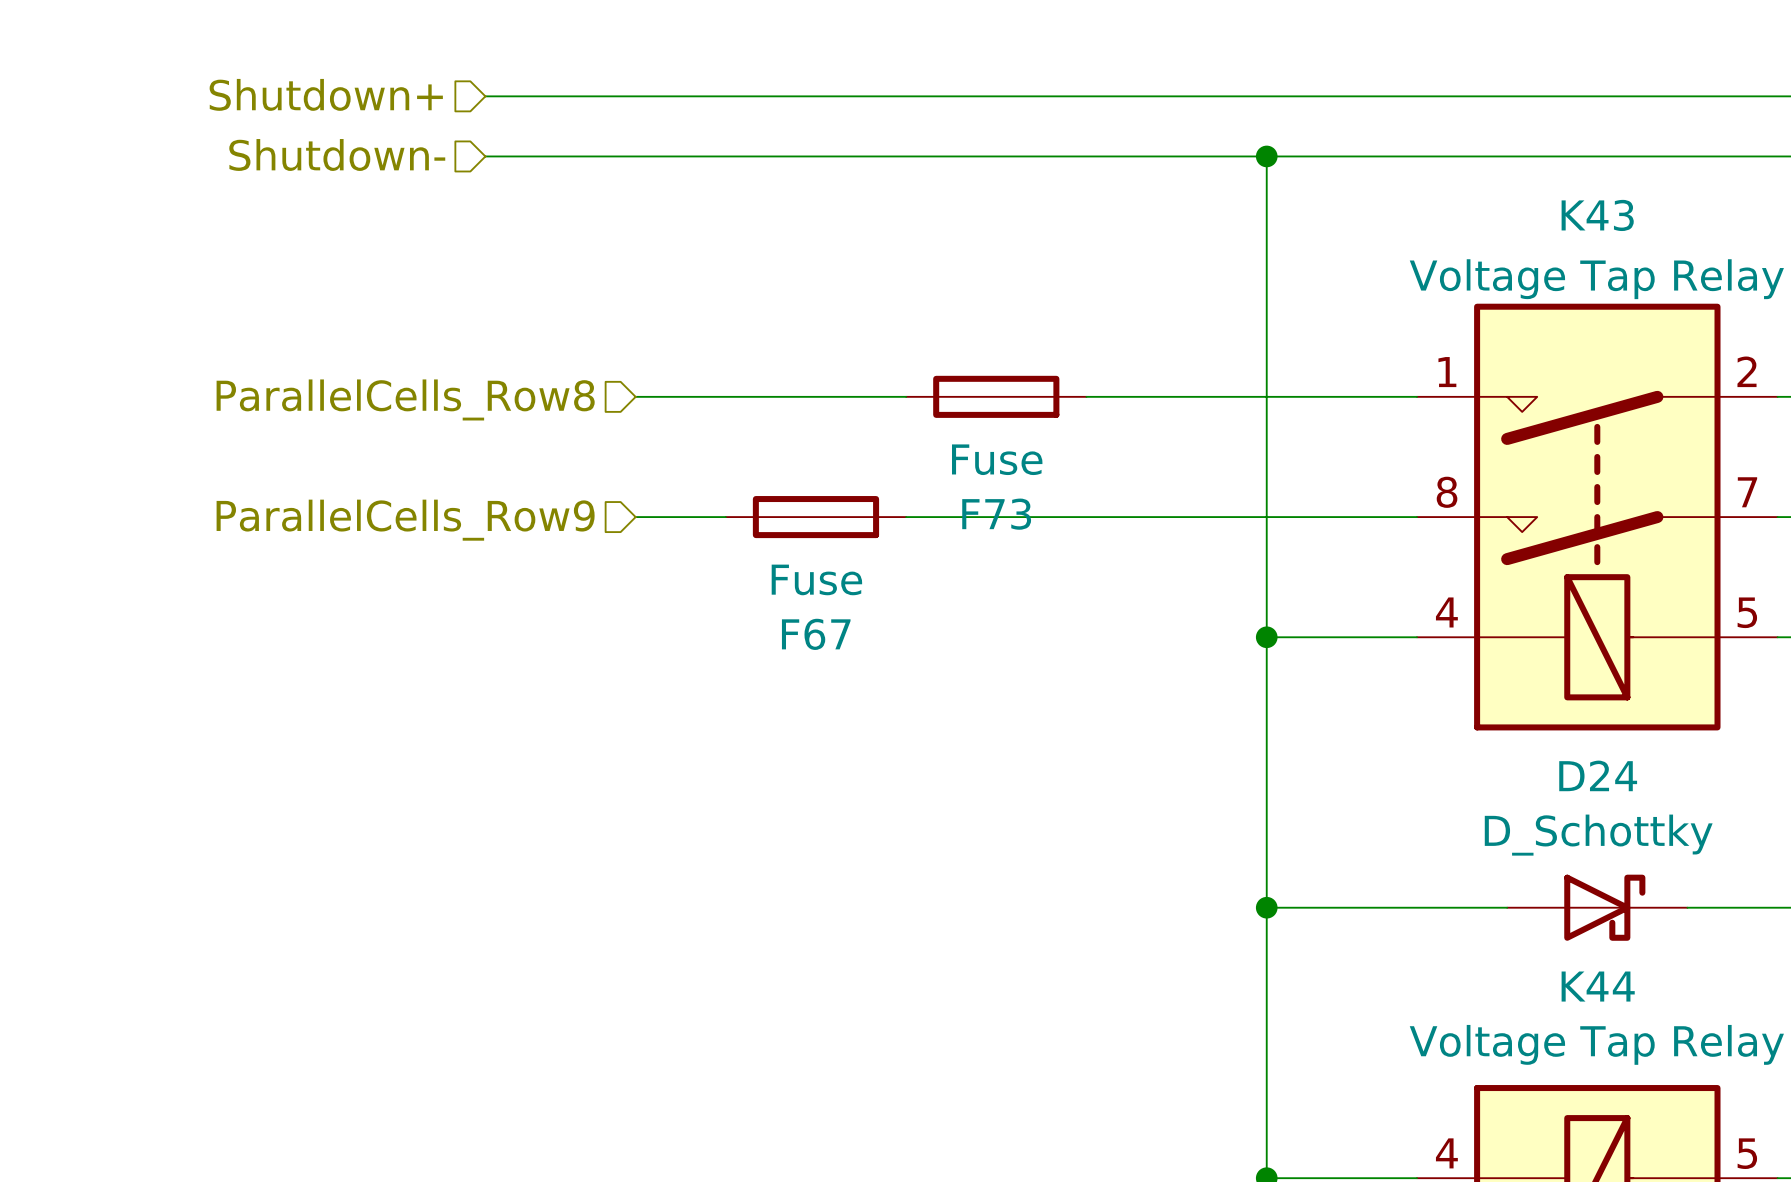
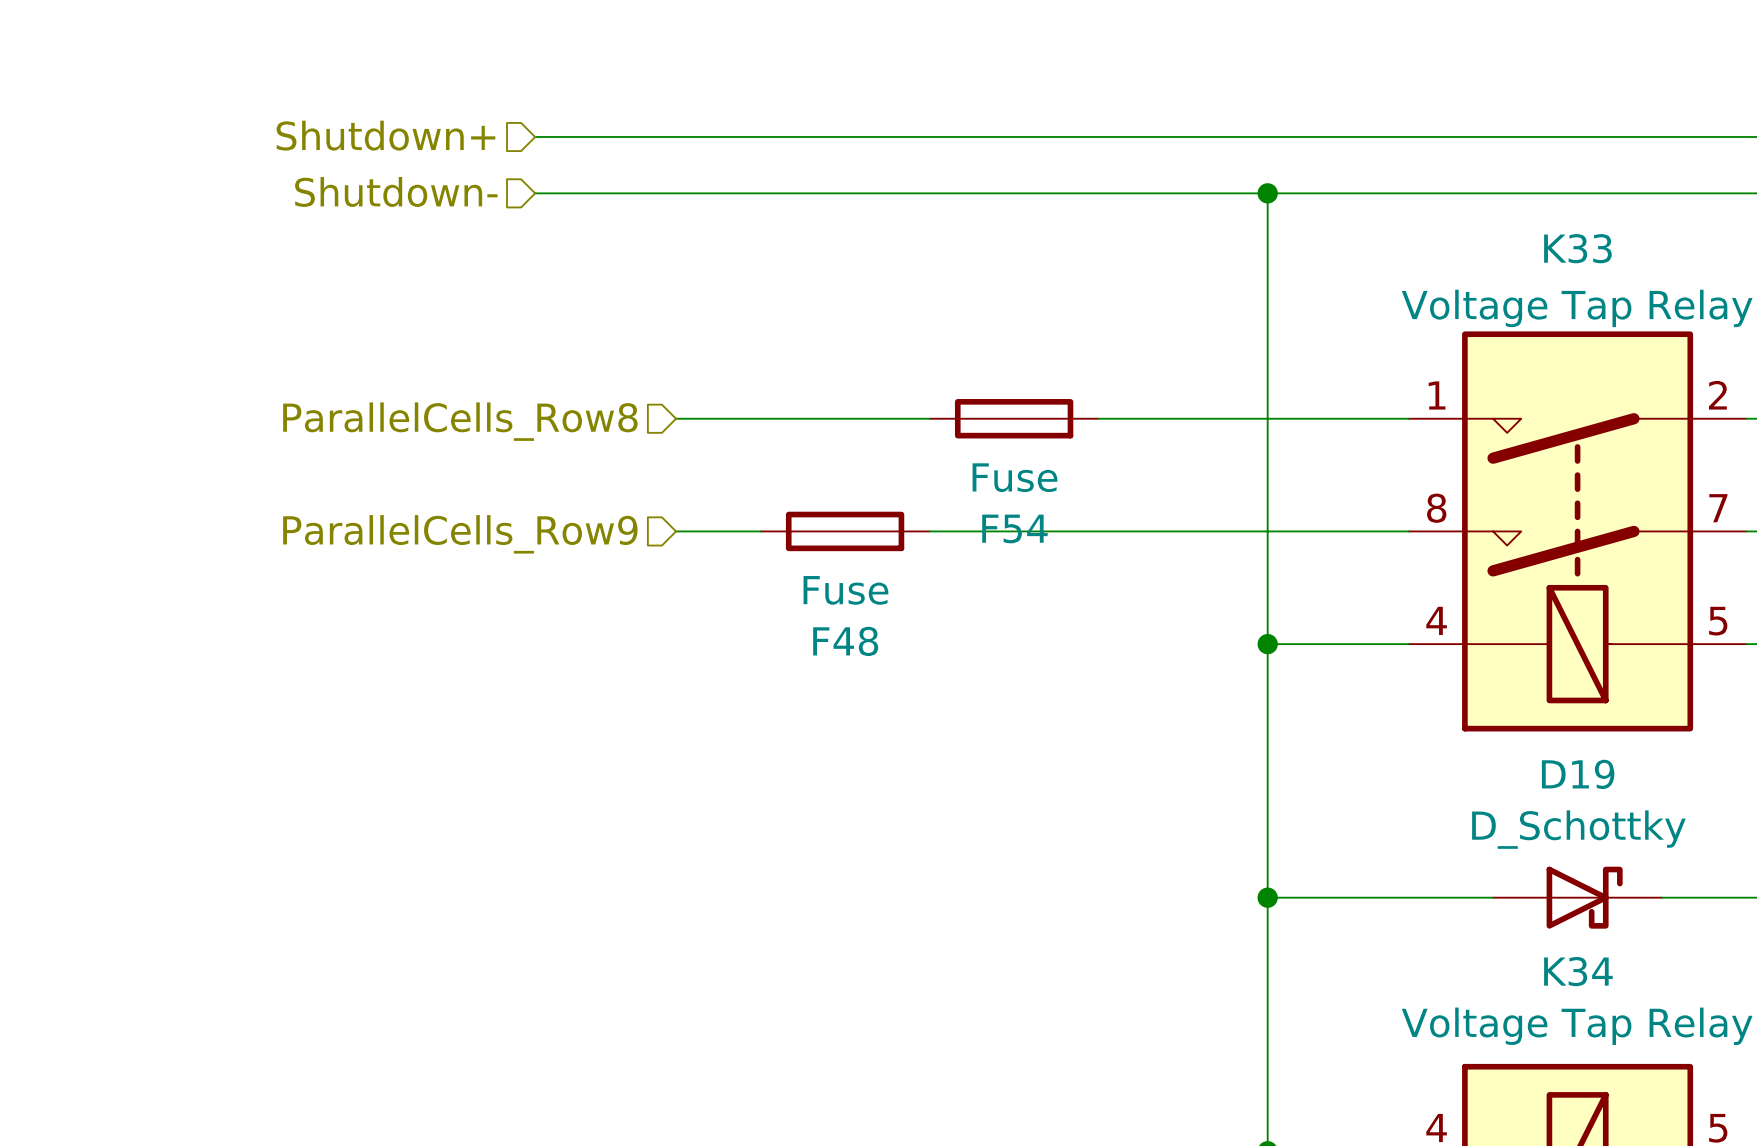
K43 name: K43 (1597, 215) -> K33 (1577, 248)
F73 name: F73 (996, 514) -> F54 (1014, 528)
F67 name: F67 (816, 634) -> F48 (845, 641)
D24 name: D24 (1598, 775) -> D19 (1578, 774)
K44 name: K44 (1598, 986) -> K34 (1578, 971)

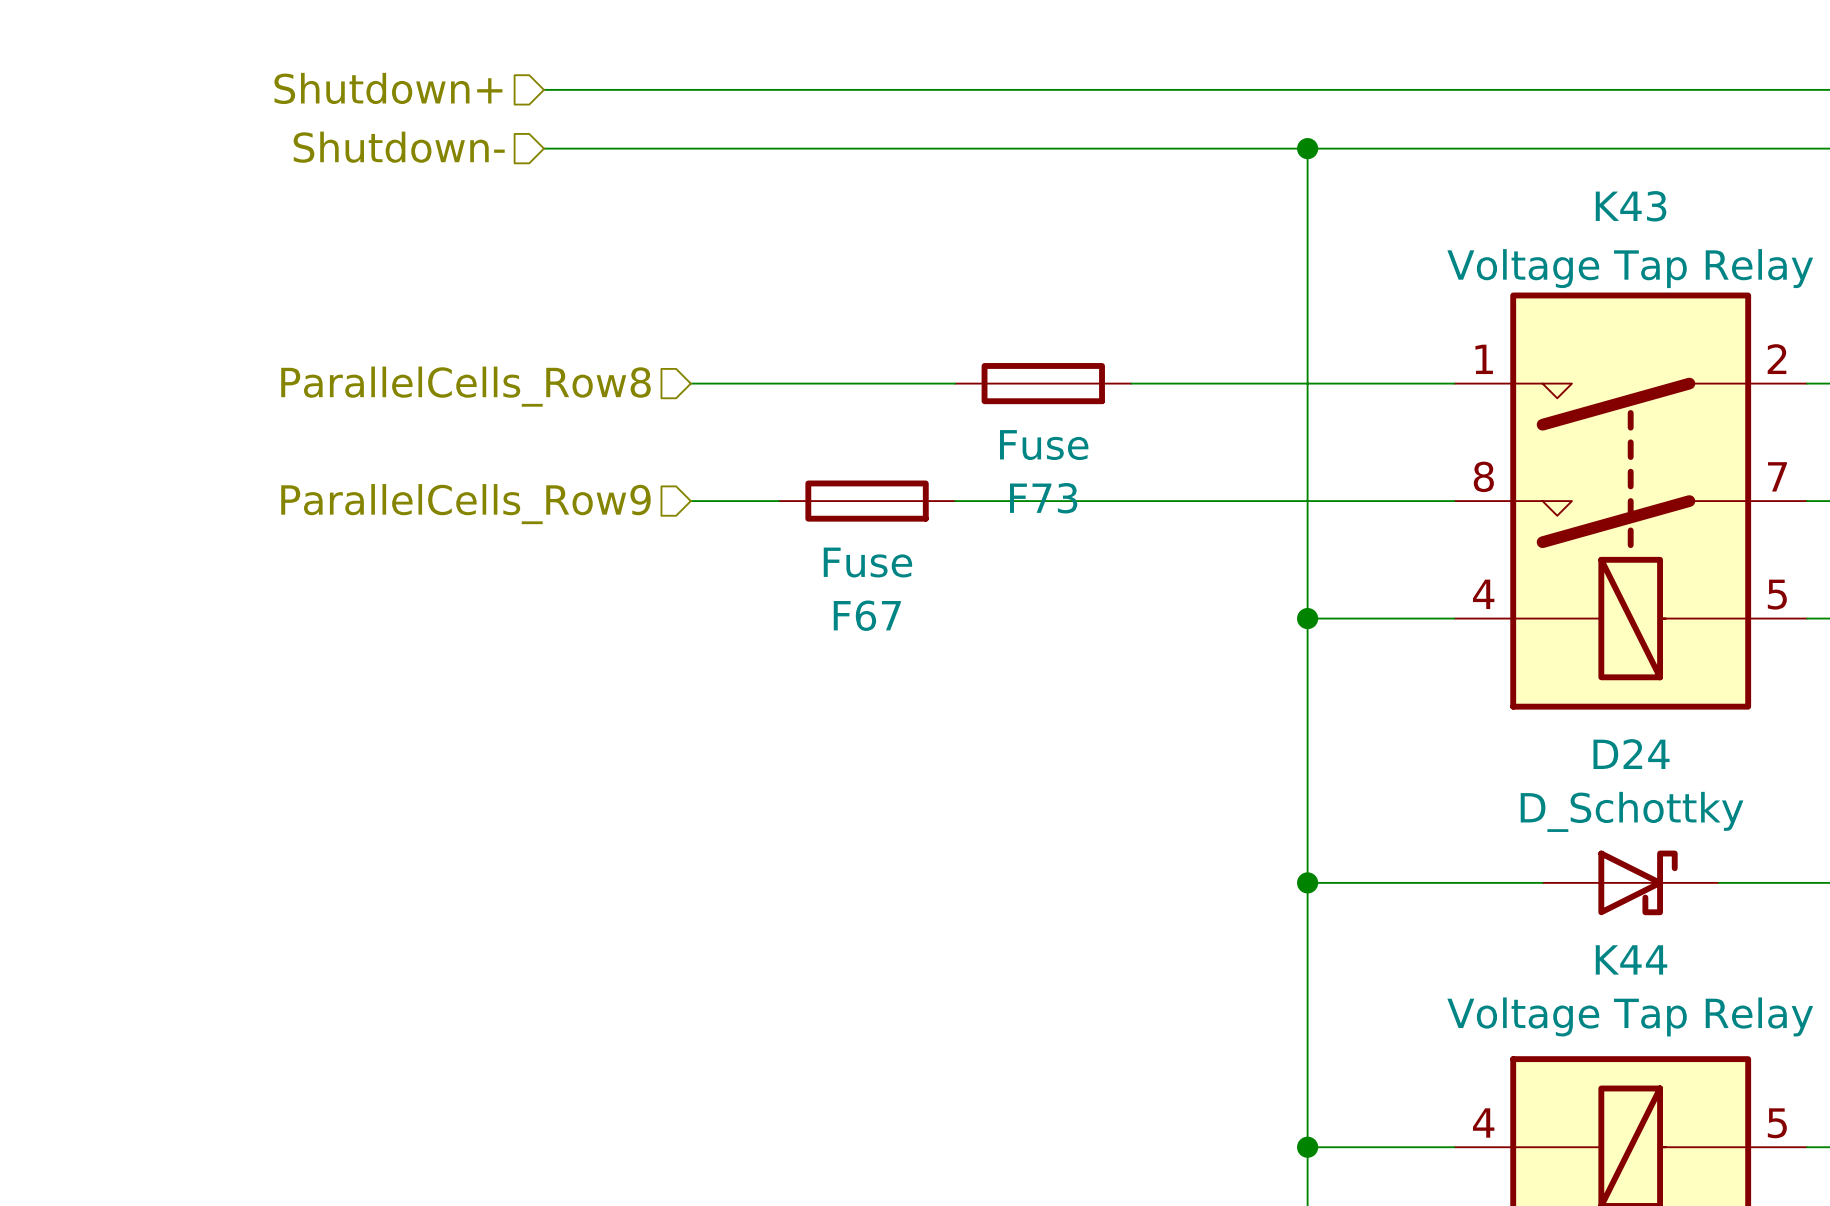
K33 name: K33 (1577, 248) -> K43 (1631, 206)
F54 name: F54 (1014, 528) -> F73 (1043, 498)
F48 name: F48 (845, 641) -> F67 (867, 615)
D19 name: D19 (1578, 774) -> D24 (1631, 754)
K34 name: K34 (1578, 971) -> K44 (1631, 959)

